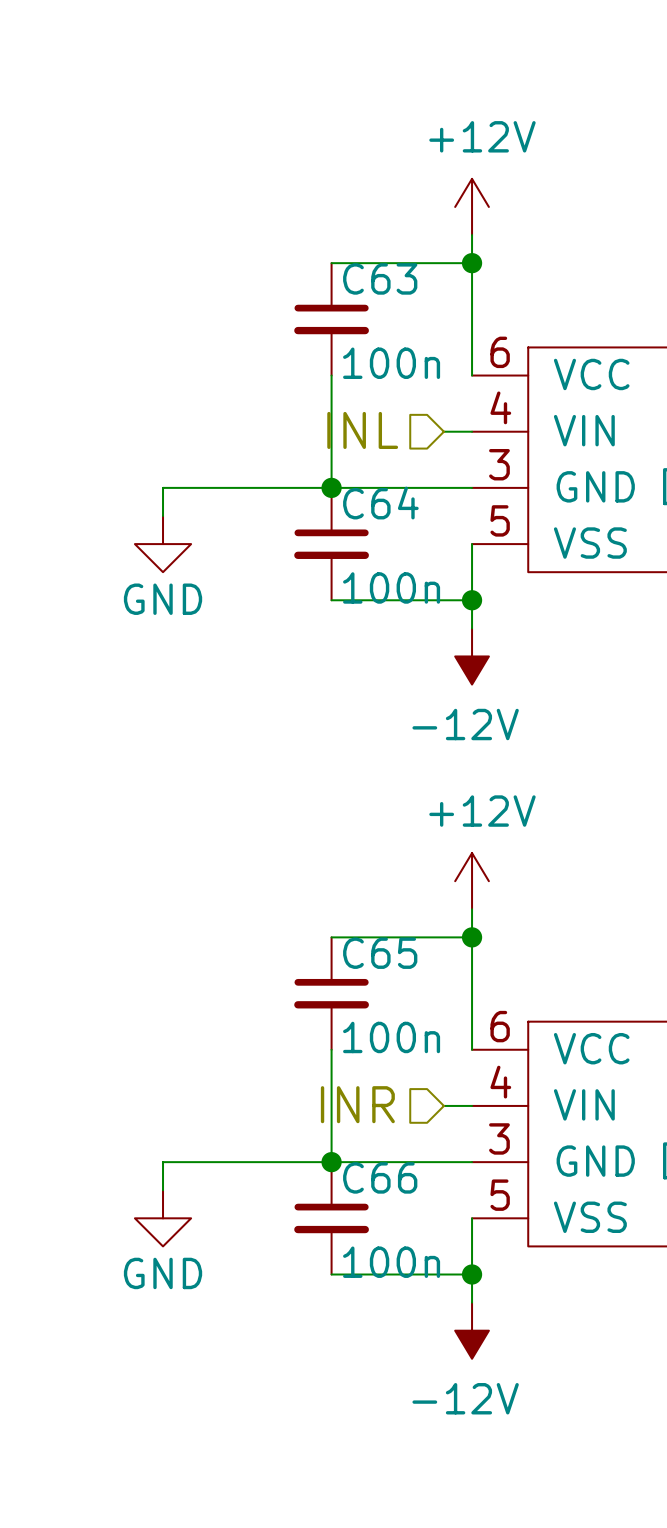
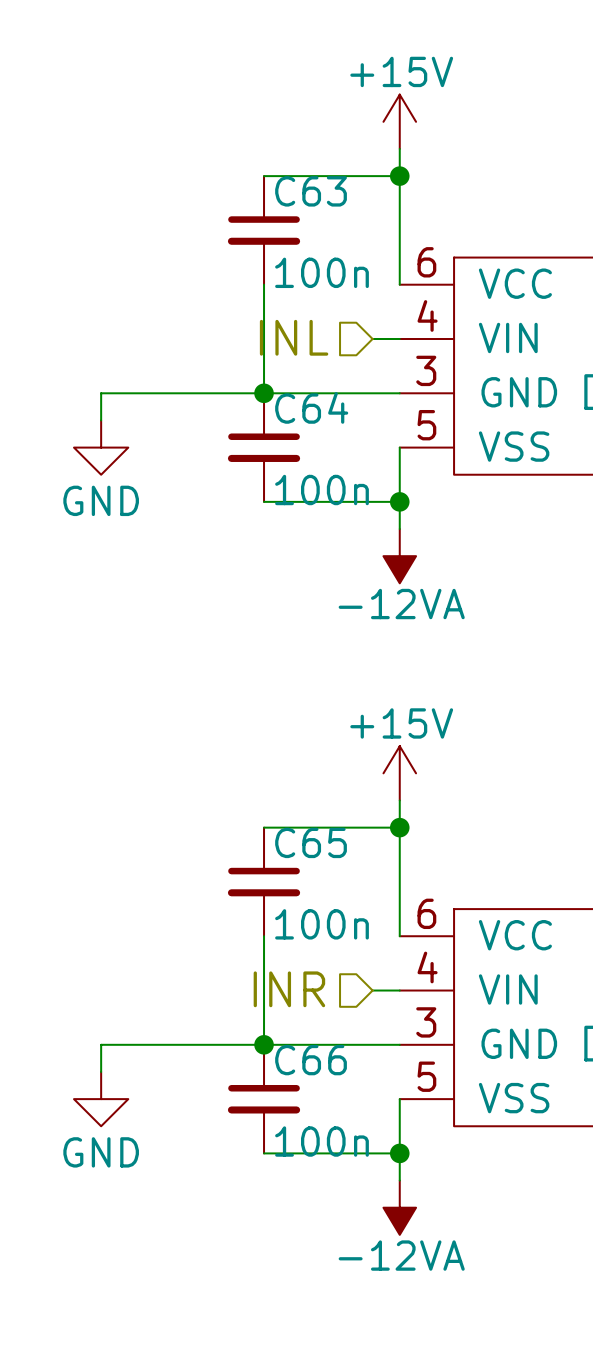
power symbol: +12V (472, 206) -> +15V (399, 121)
power symbol: -12V (472, 656) -> -12VA (399, 556)
power symbol: +12V (472, 881) -> +15V (399, 773)
power symbol: -12V (472, 1330) -> -12VA (399, 1207)

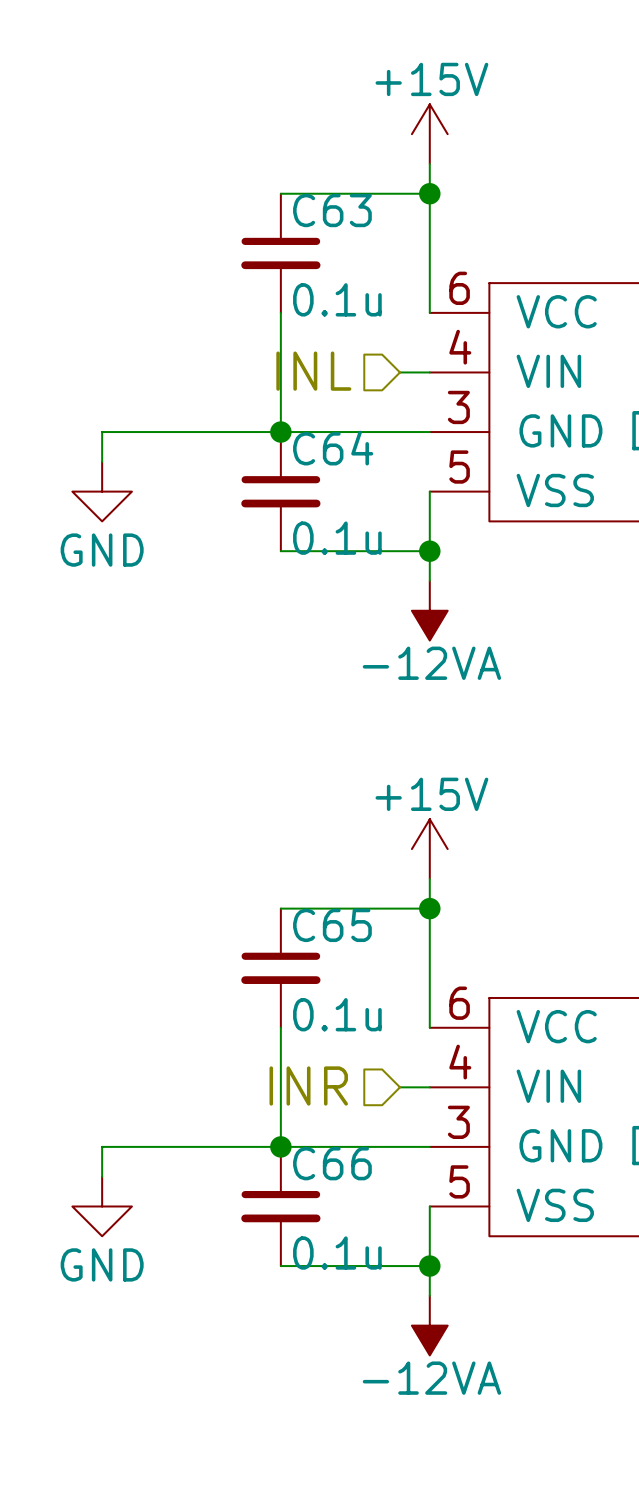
C63 value: 100n (322, 272) -> 0.1u (337, 299)
C64 value: 100n (322, 490) -> 0.1u (337, 538)
C65 value: 100n (322, 924) -> 0.1u (337, 1014)
C66 value: 100n (322, 1141) -> 0.1u (337, 1253)

